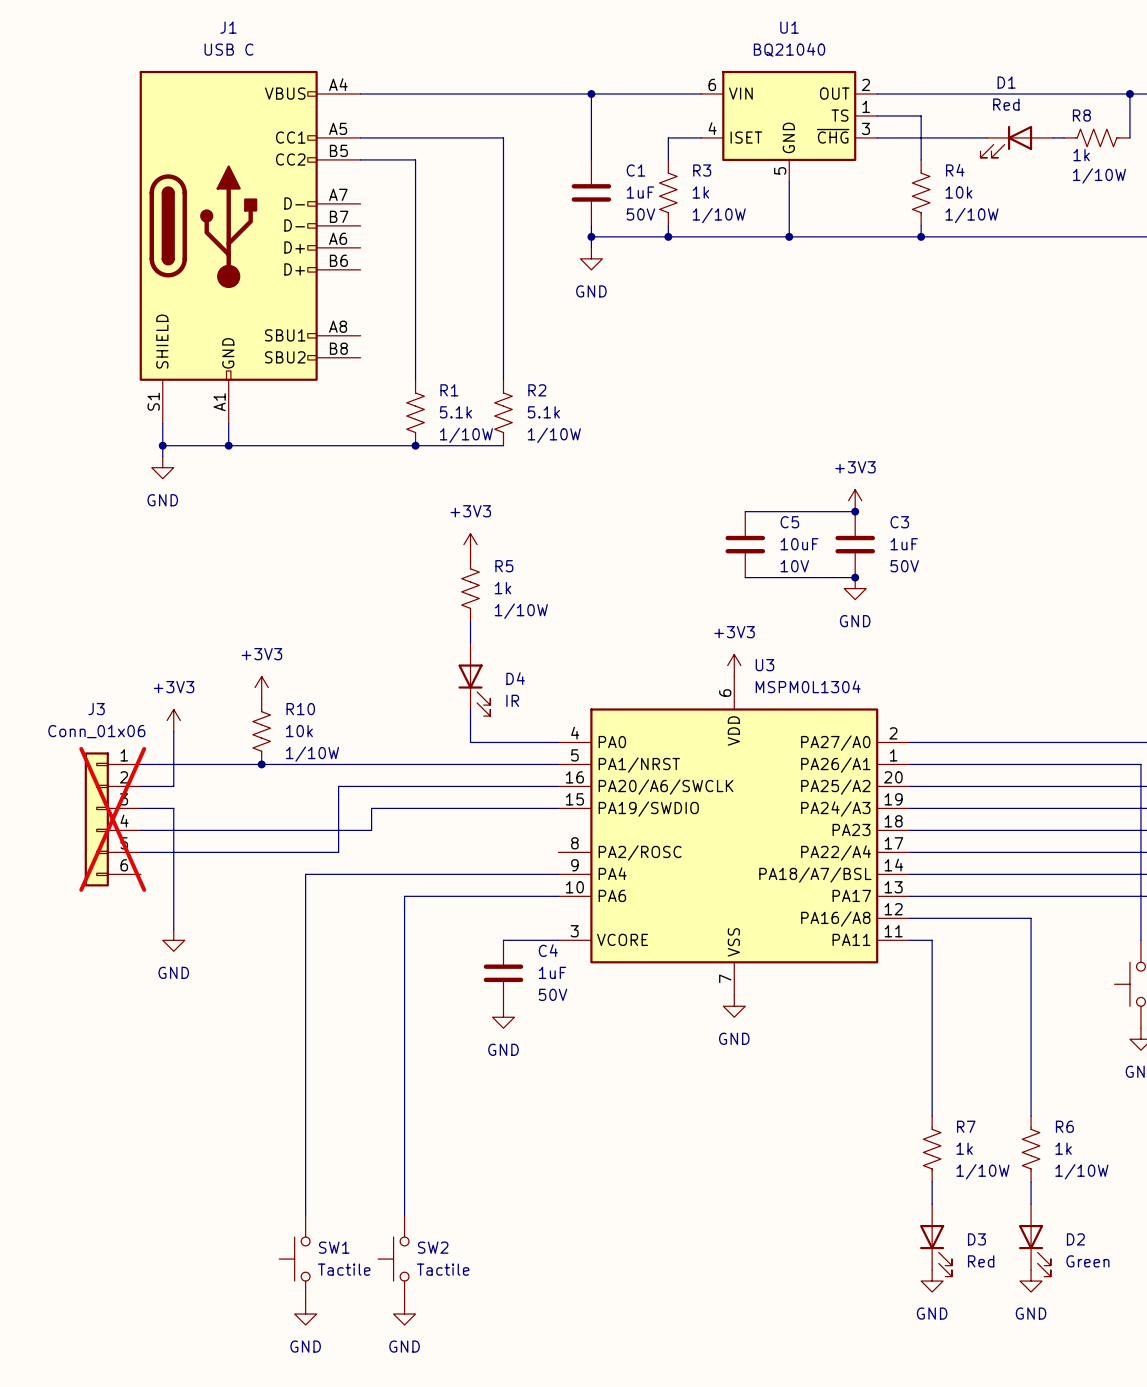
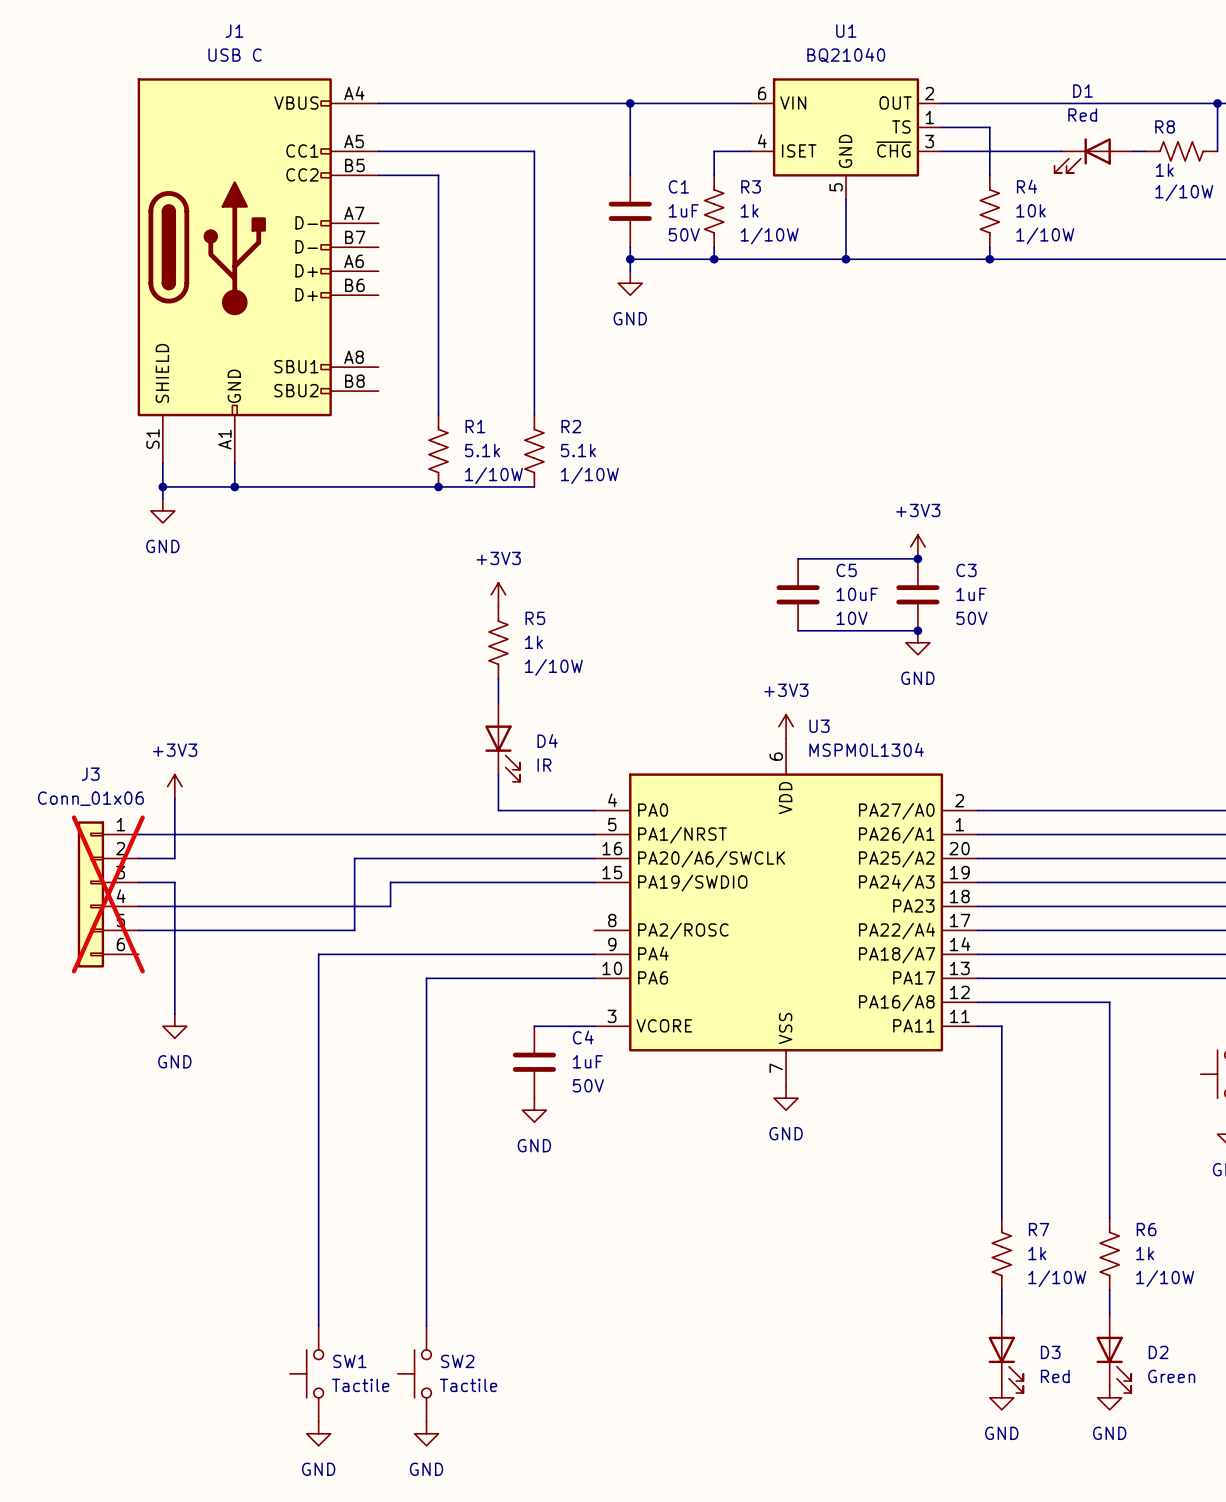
power symbol: +3V3 (261, 687) -> none
R10: 10k (261, 731) -> none
junction: (261, 764) -> none
U3 pin name: PA18/A7/BSL (815, 875) -> PA18/A7 (897, 955)

